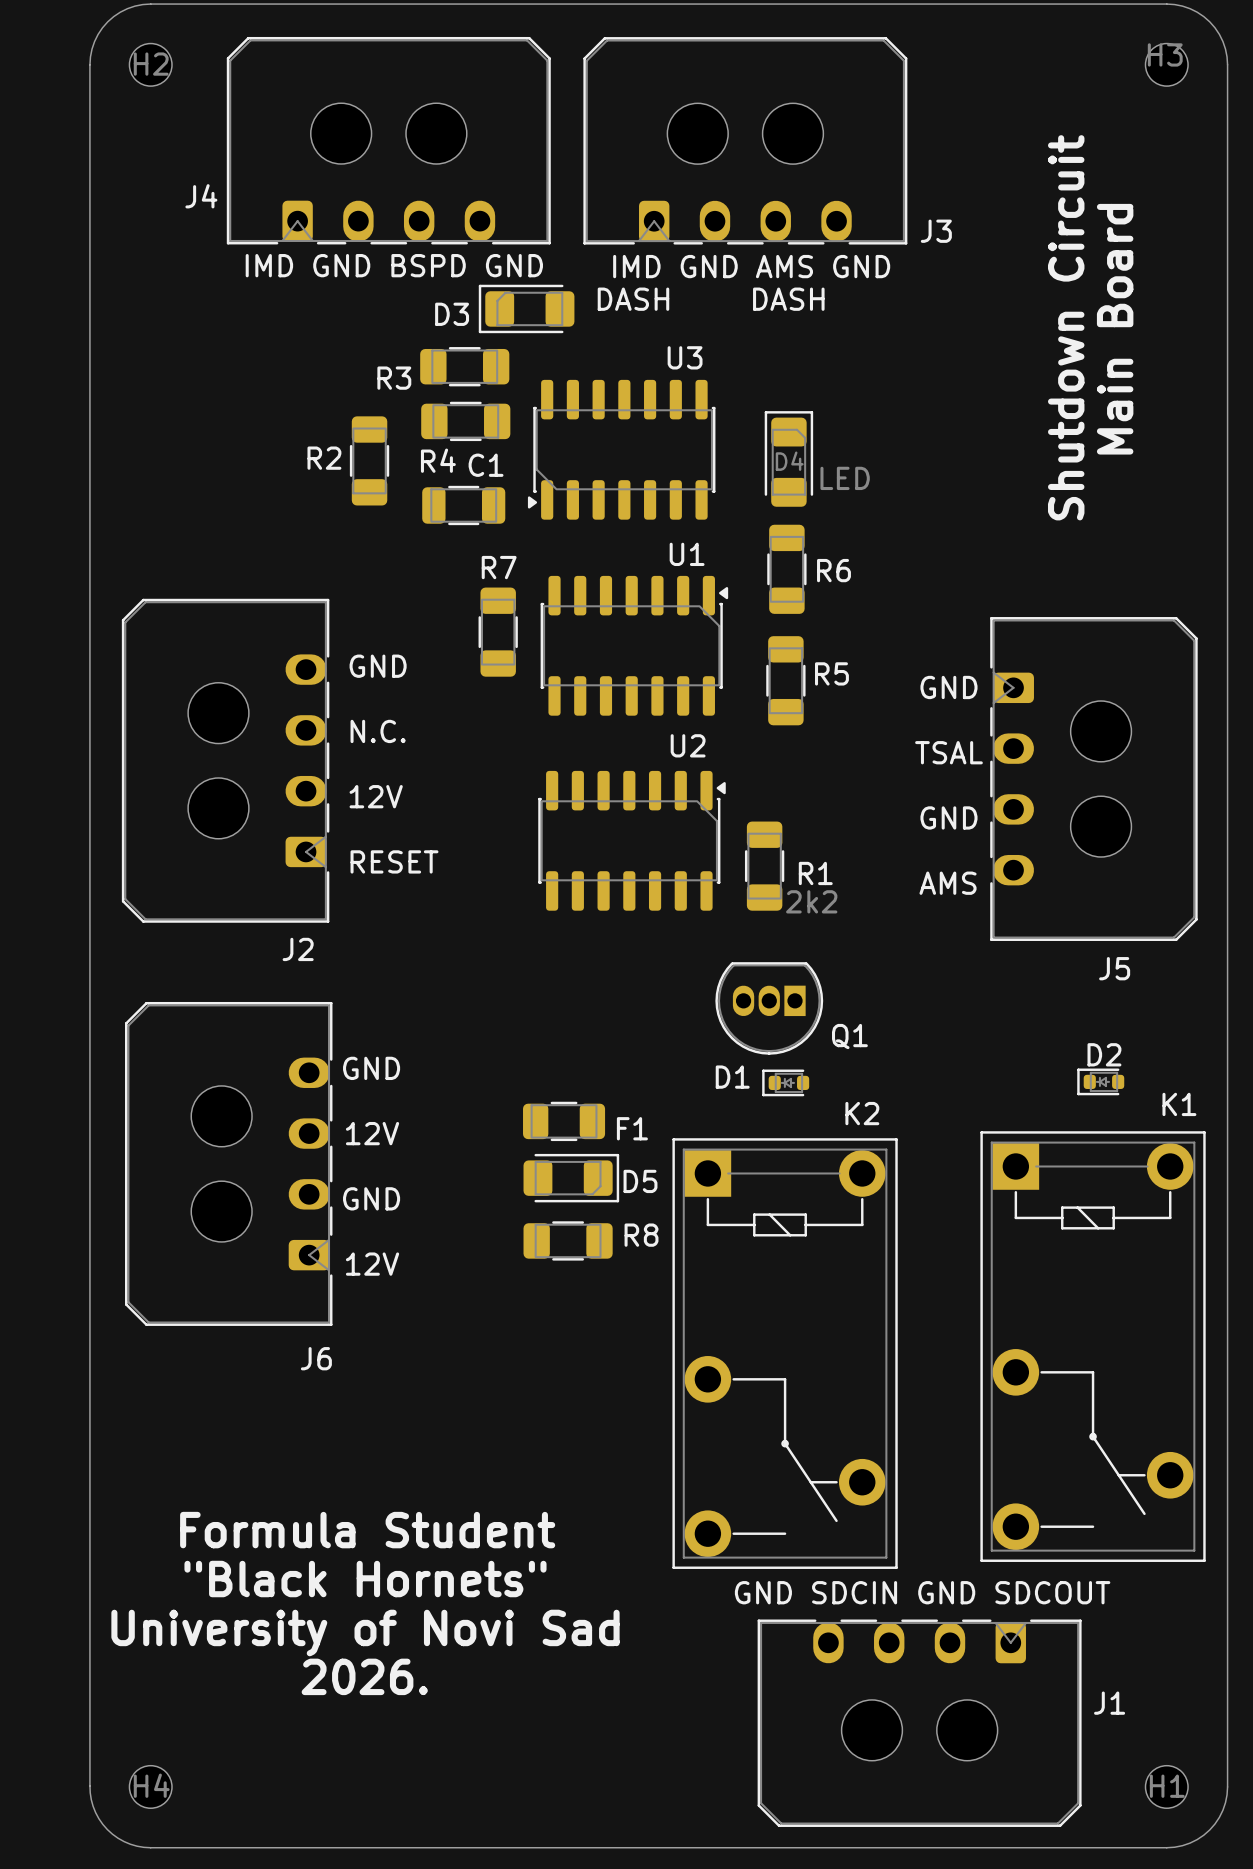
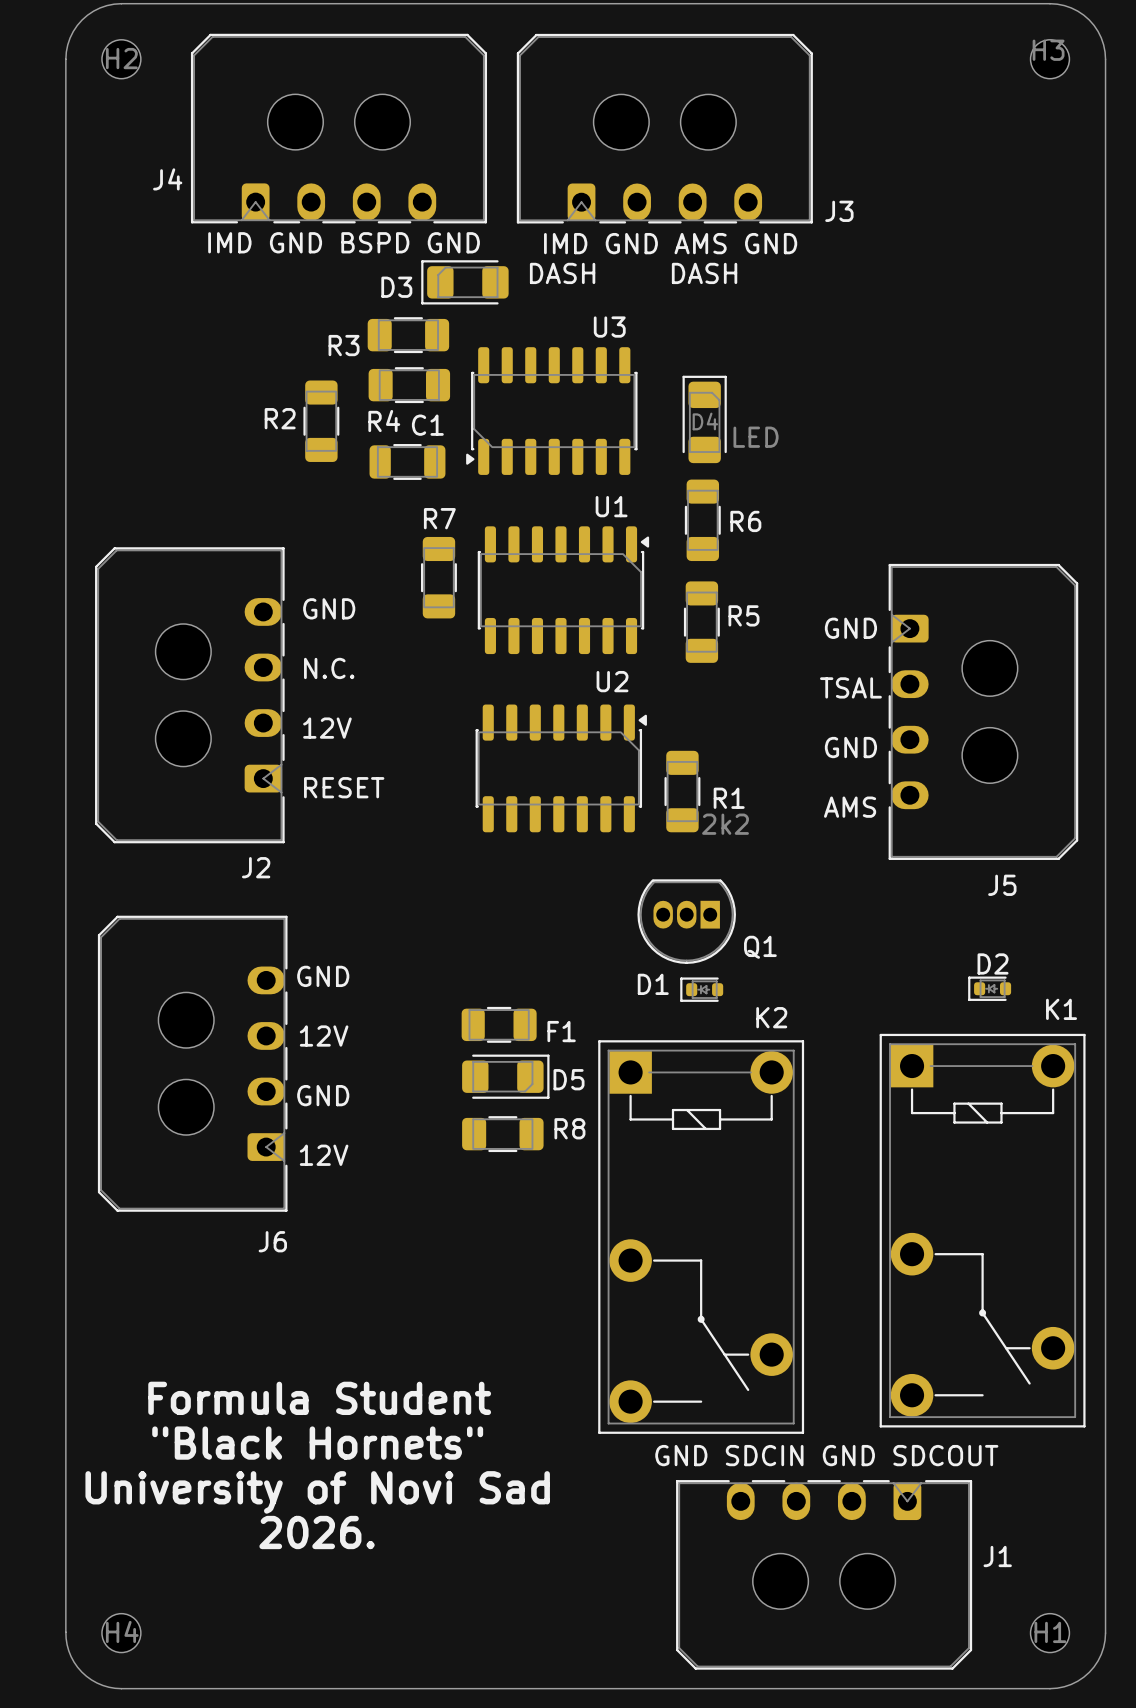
text: Shutdown Circuit (1066, 327) -> none
text: Main Board (1115, 329) -> none

